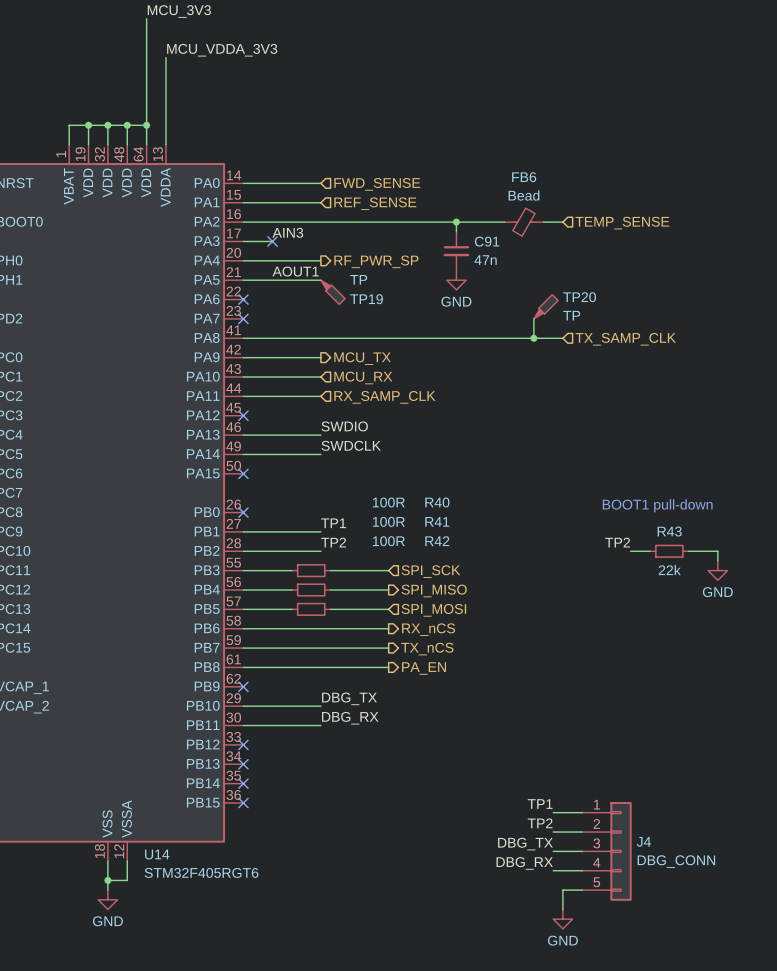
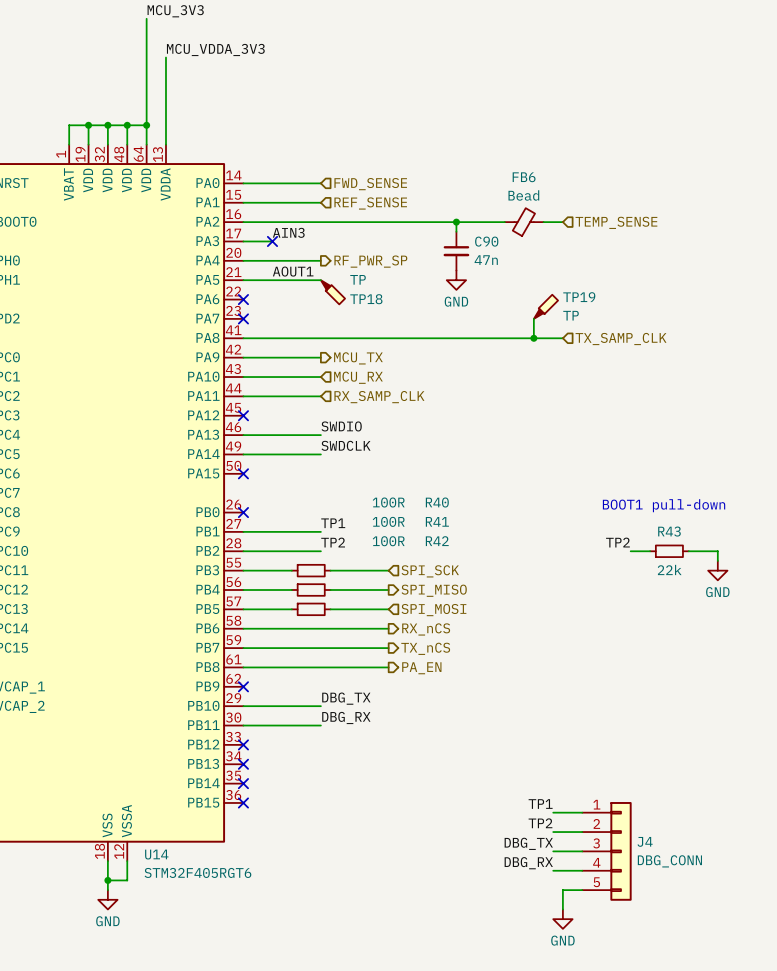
C91 name: C91 (487, 241) -> C90 (486, 241)
TP20 name: TP20 (579, 297) -> TP19 (579, 297)
TP19 name: TP19 (366, 299) -> TP18 (366, 299)

